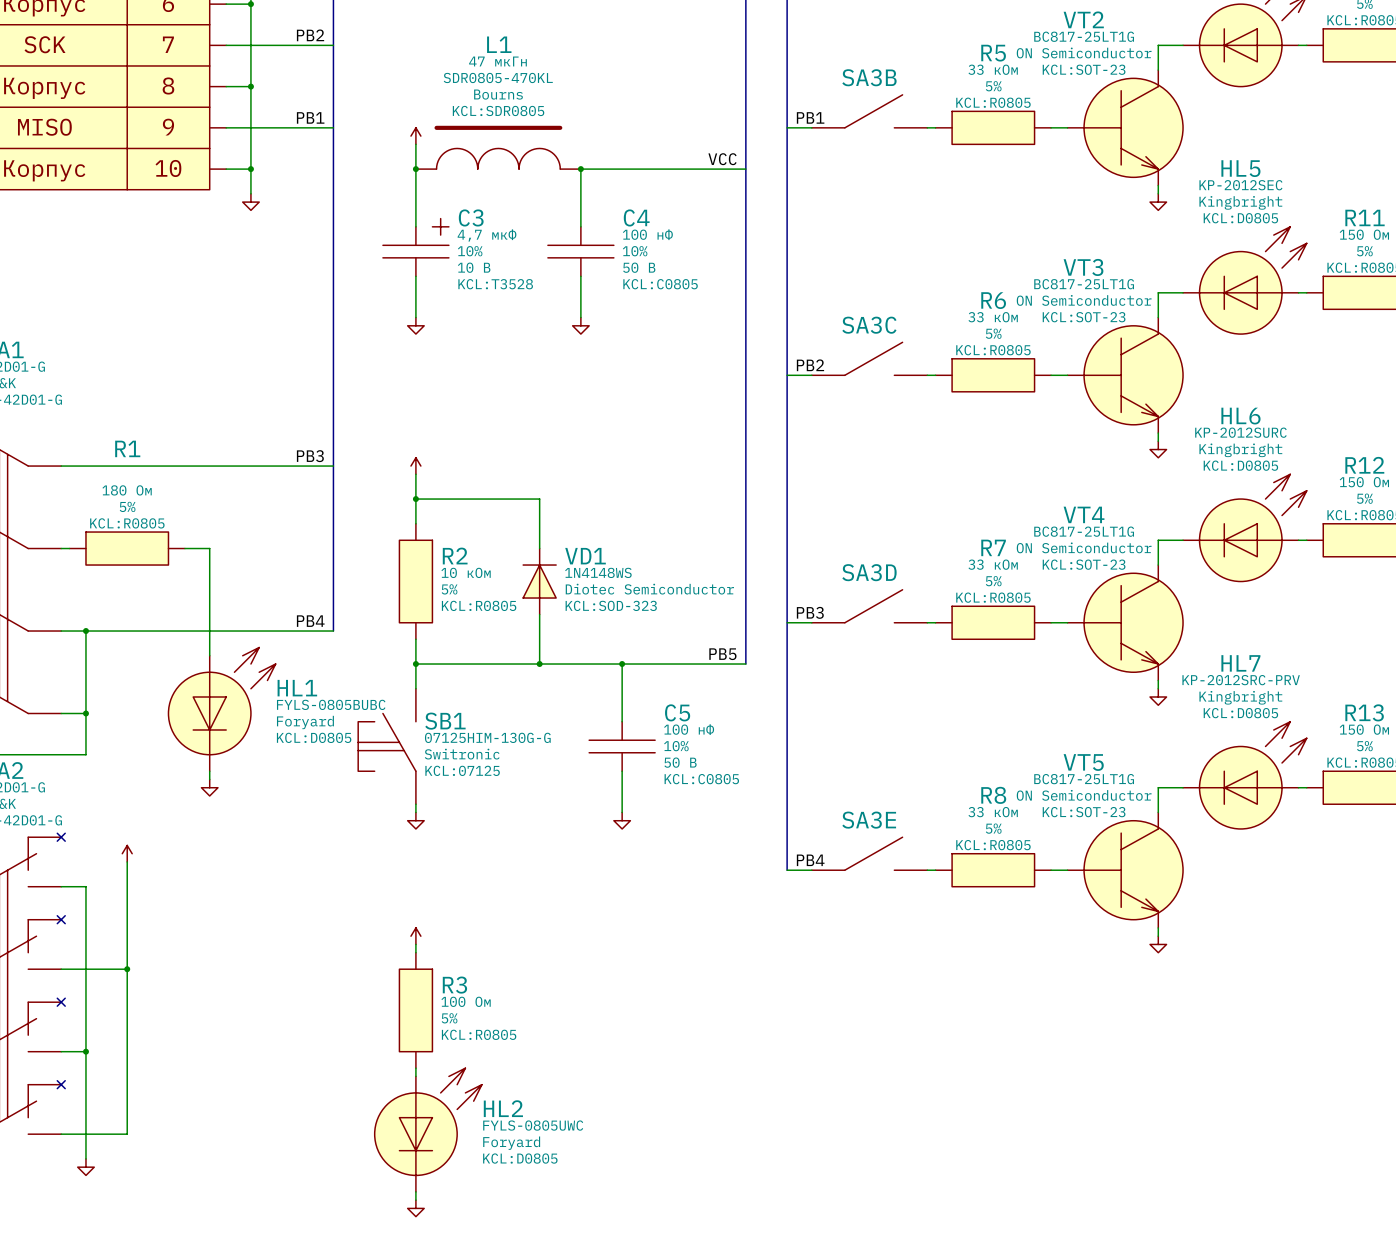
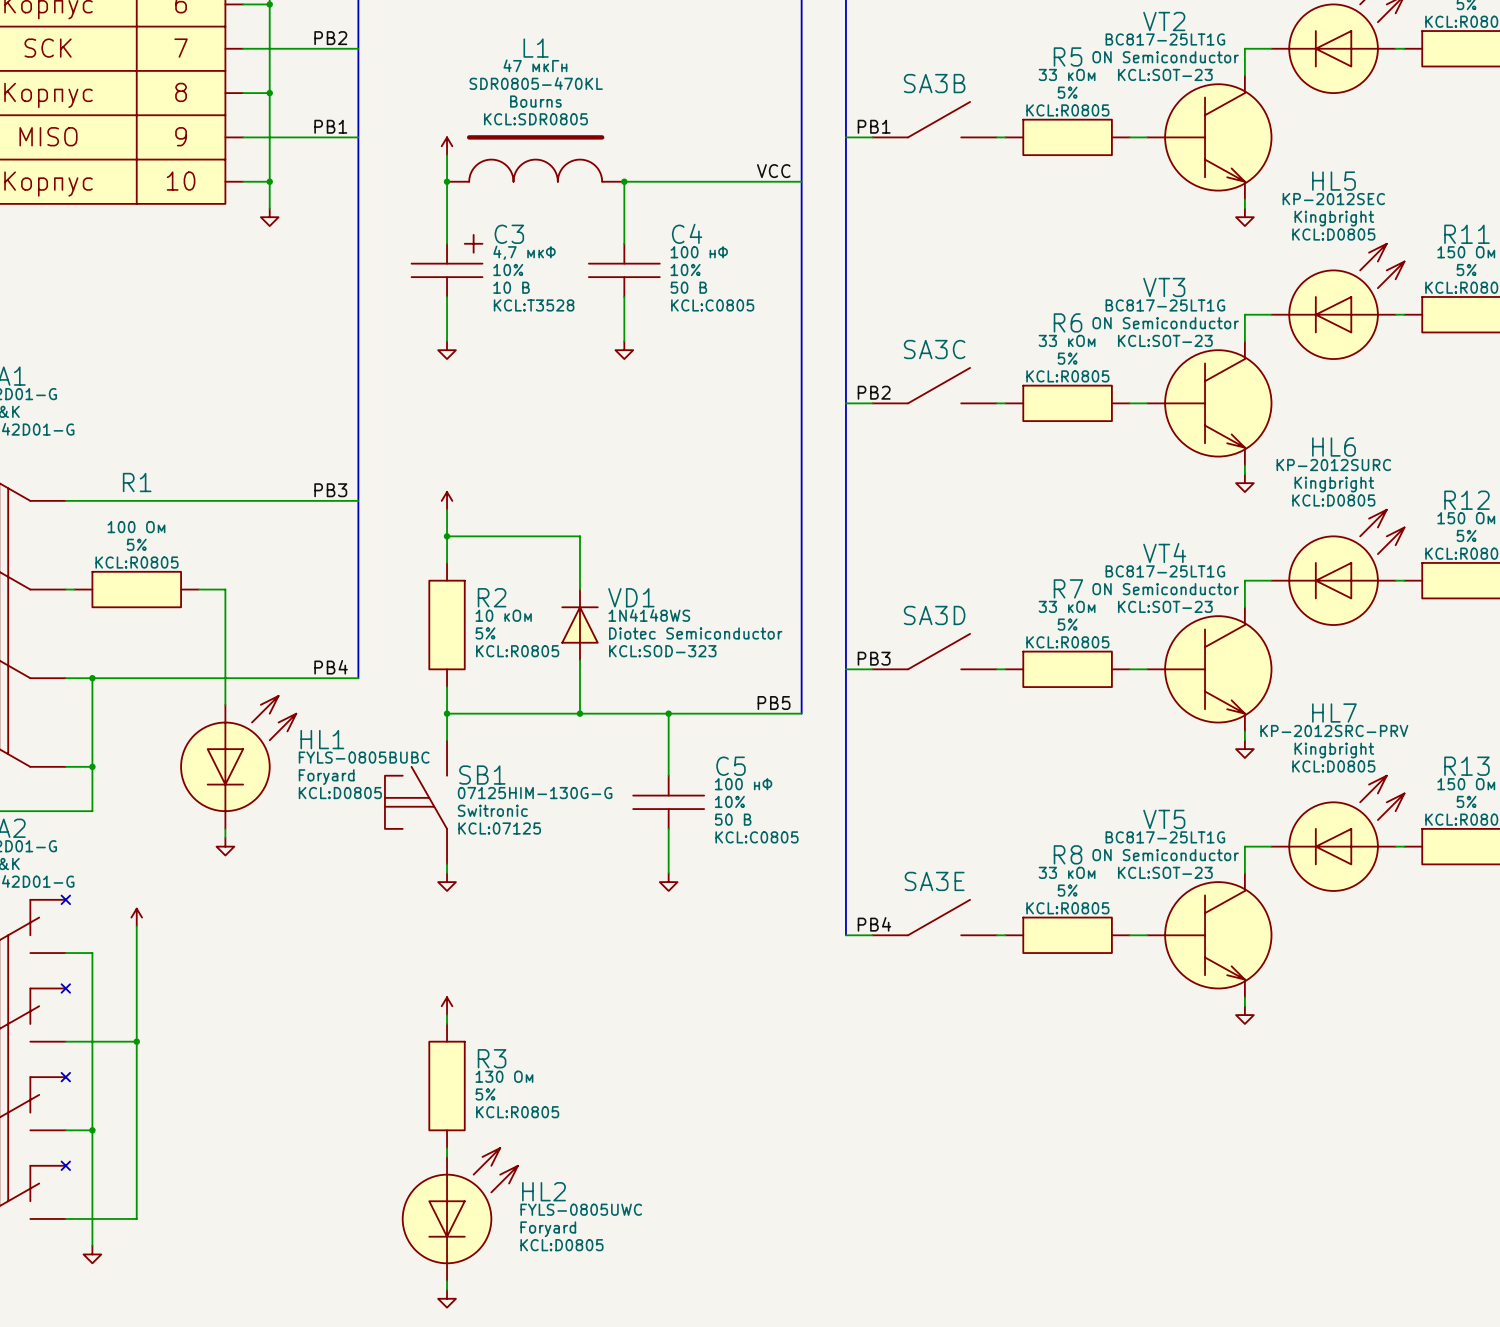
R1 text: 180 Ом (127, 490) -> 100 Ом (136, 527)
R3 text: 100 Ом (466, 1001) -> 130 Ом (504, 1076)

